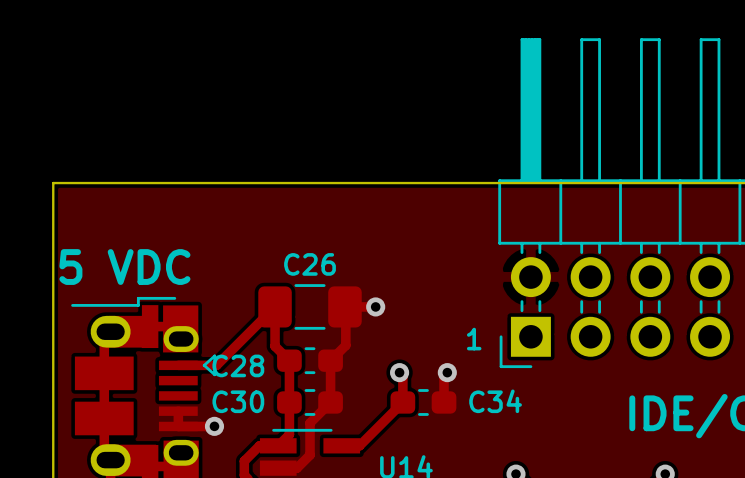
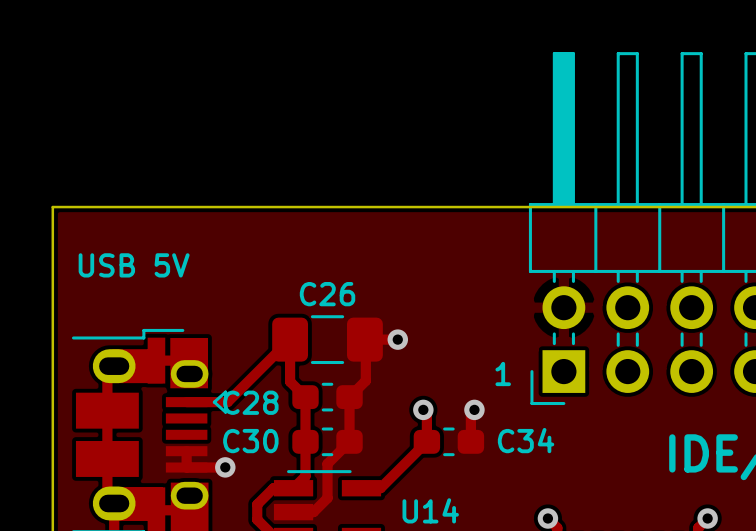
text: none -> USB 5V (134, 265)
text: 5 VDC (124, 267) -> none

